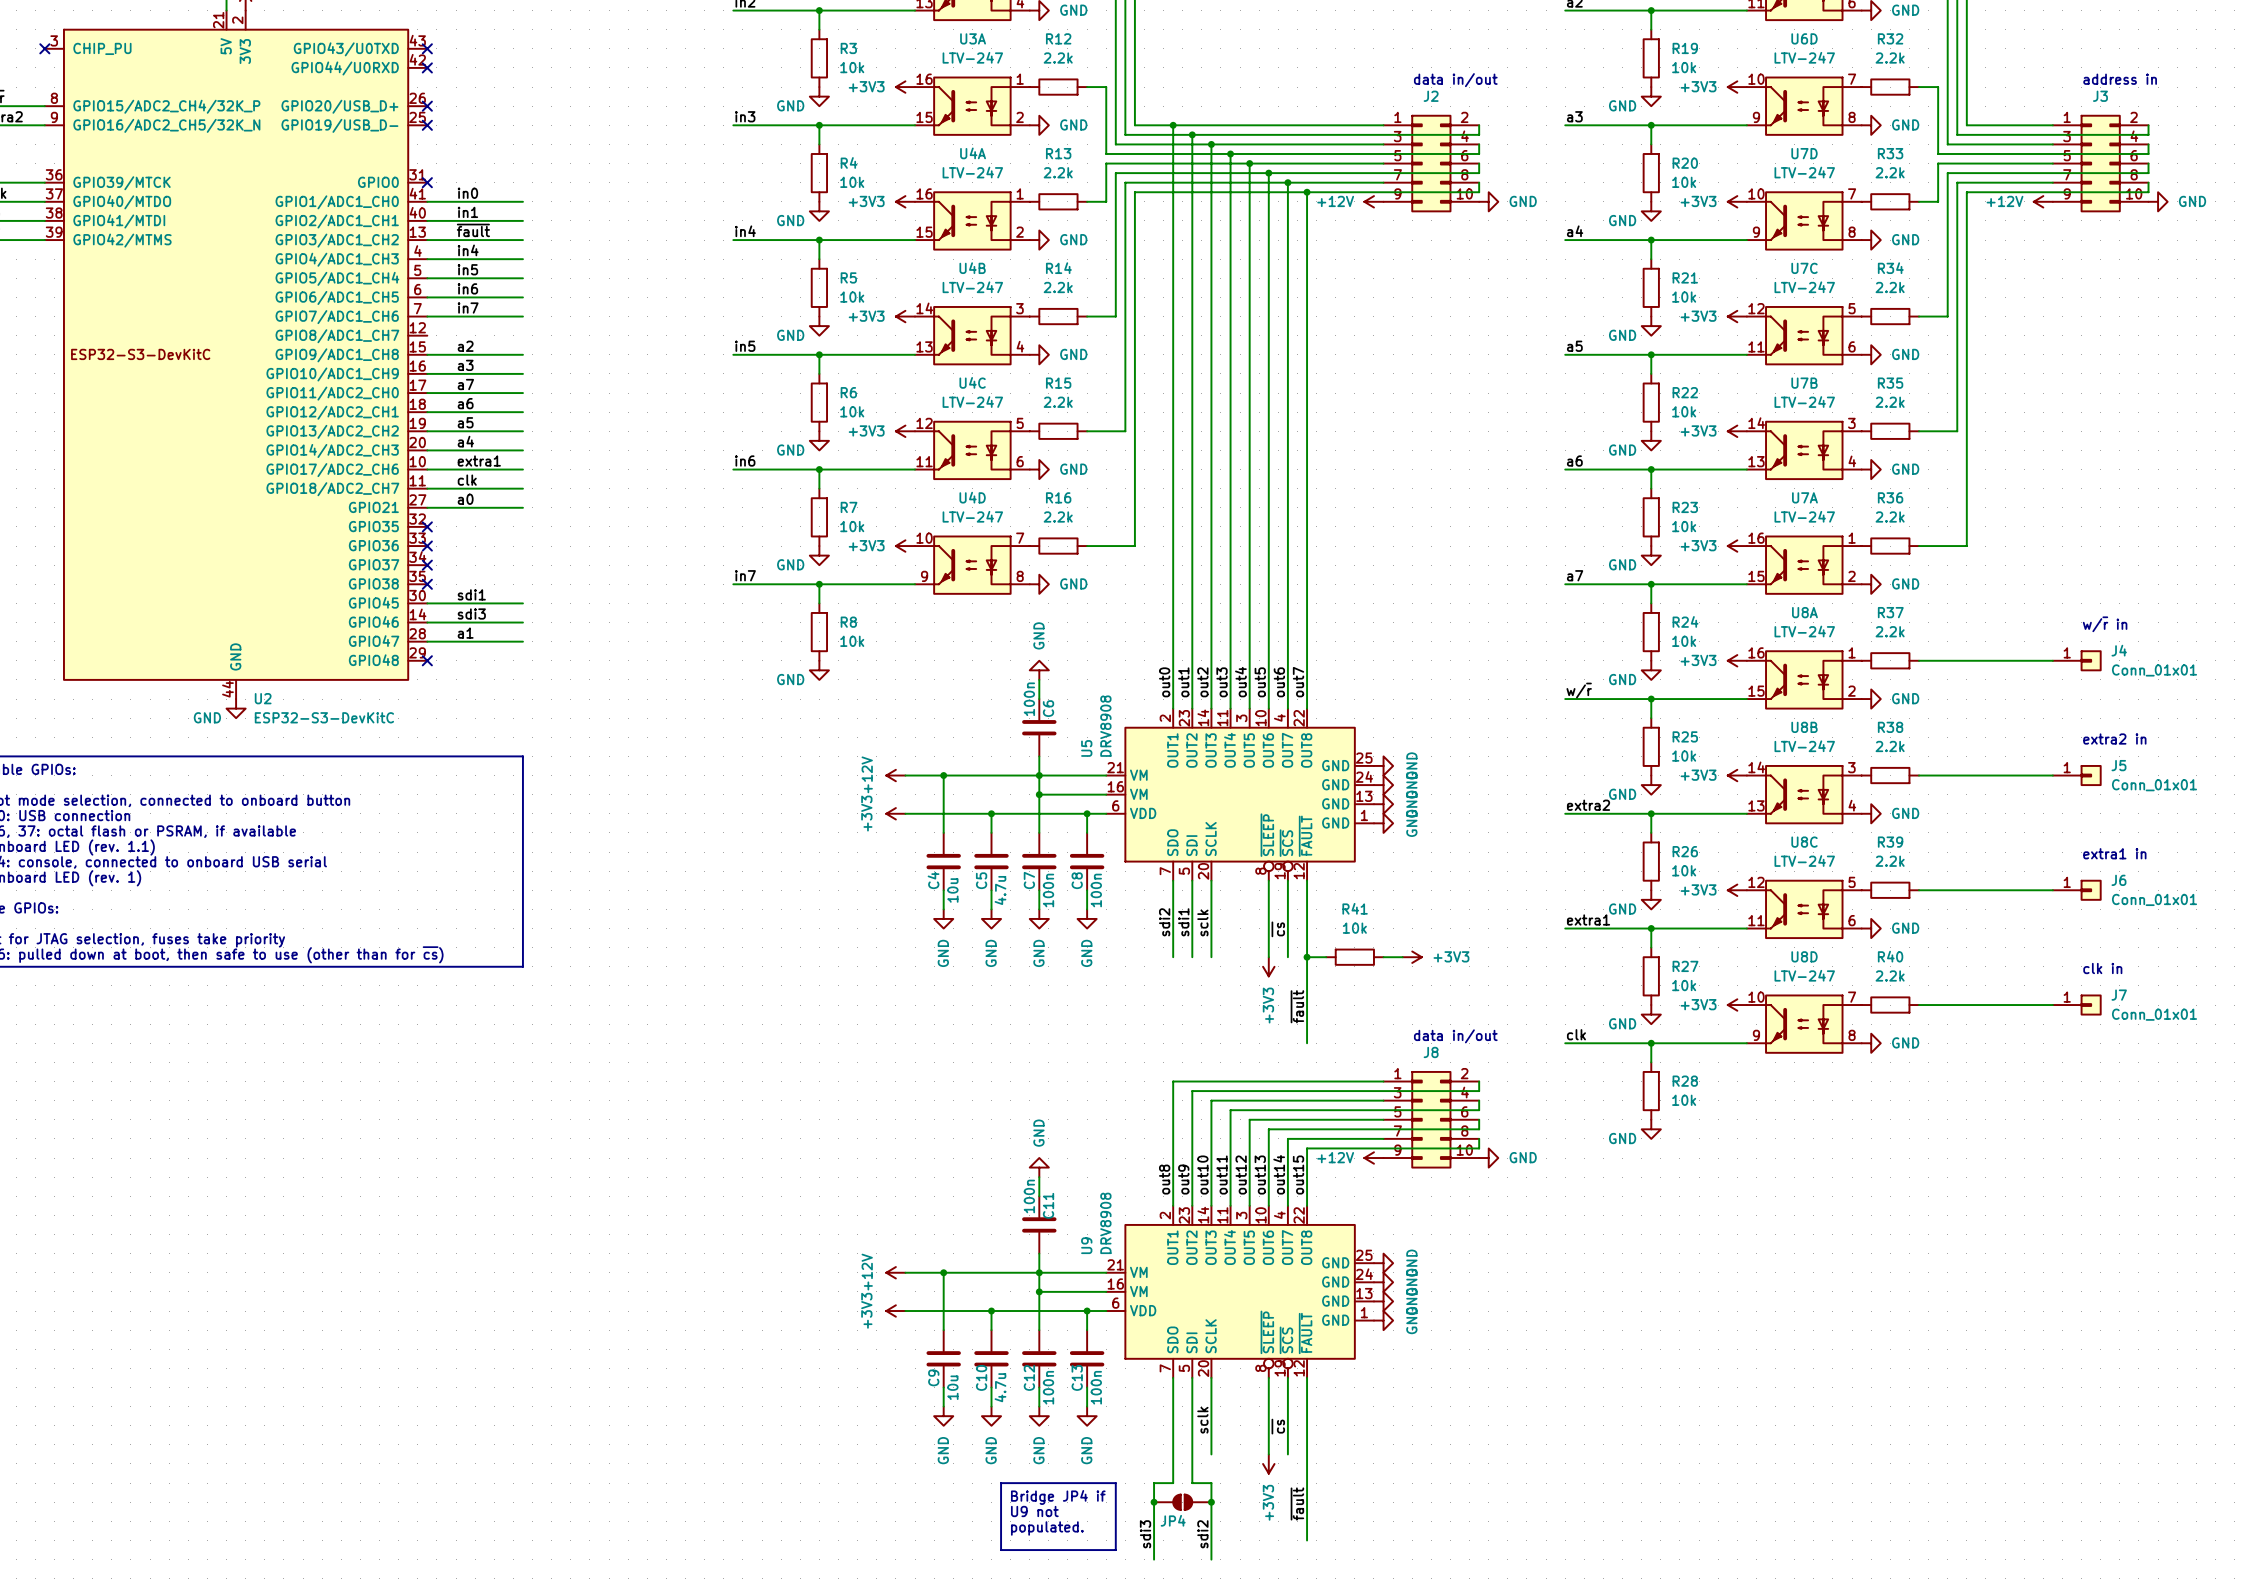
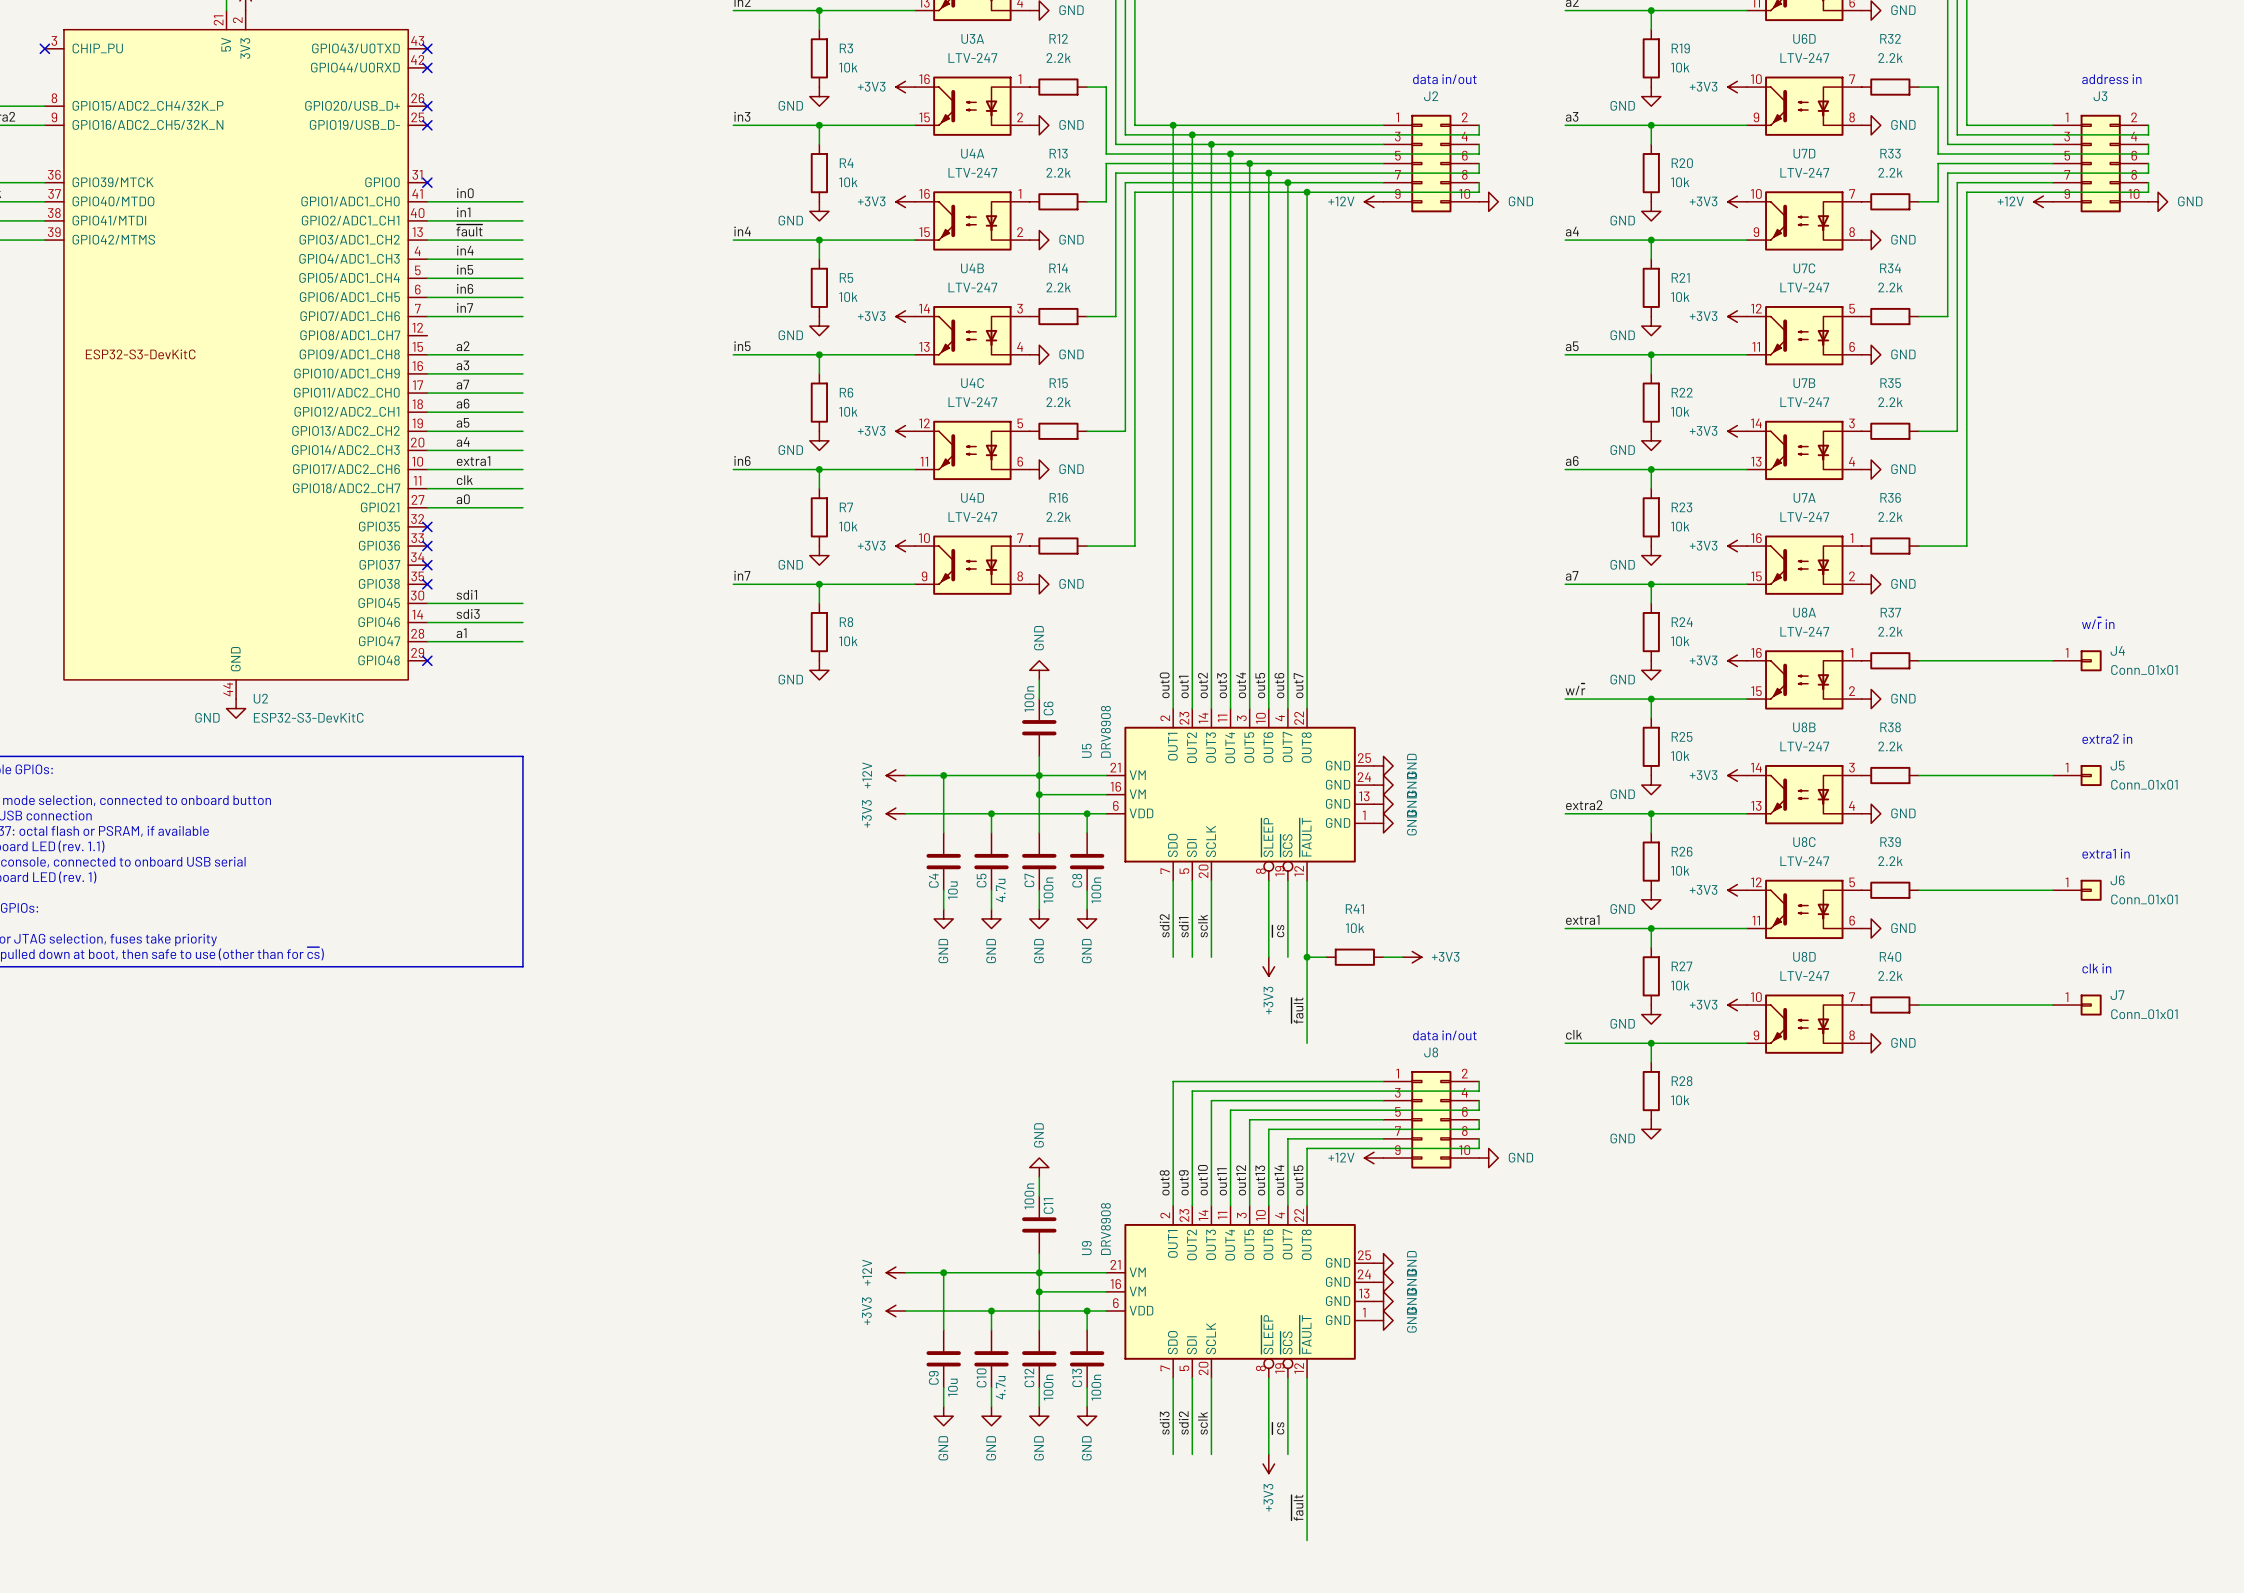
wire: (1173, 1454) (1173, 1483) (1154, 1483) (1154, 1559) -> none
wire: (1192, 1454) (1192, 1483) (1211, 1483) (1211, 1559) -> none
line: (1001, 1483) (1115, 1483) (1115, 1550) (1001, 1550) (1001, 1483) -> none
text: Bridge JP4 if (1058, 1497) -> none
junction: (1154, 1502) -> none
JP4: (1182, 1502) -> none
junction: (1211, 1502) -> none
text: U9 not (1034, 1511) -> none
text: populated. (1047, 1528) -> none
label position: sdi3 (1145, 1534) -> sdi3 (1164, 1423)
label position: sdi2 (1202, 1534) -> sdi2 (1183, 1422)

